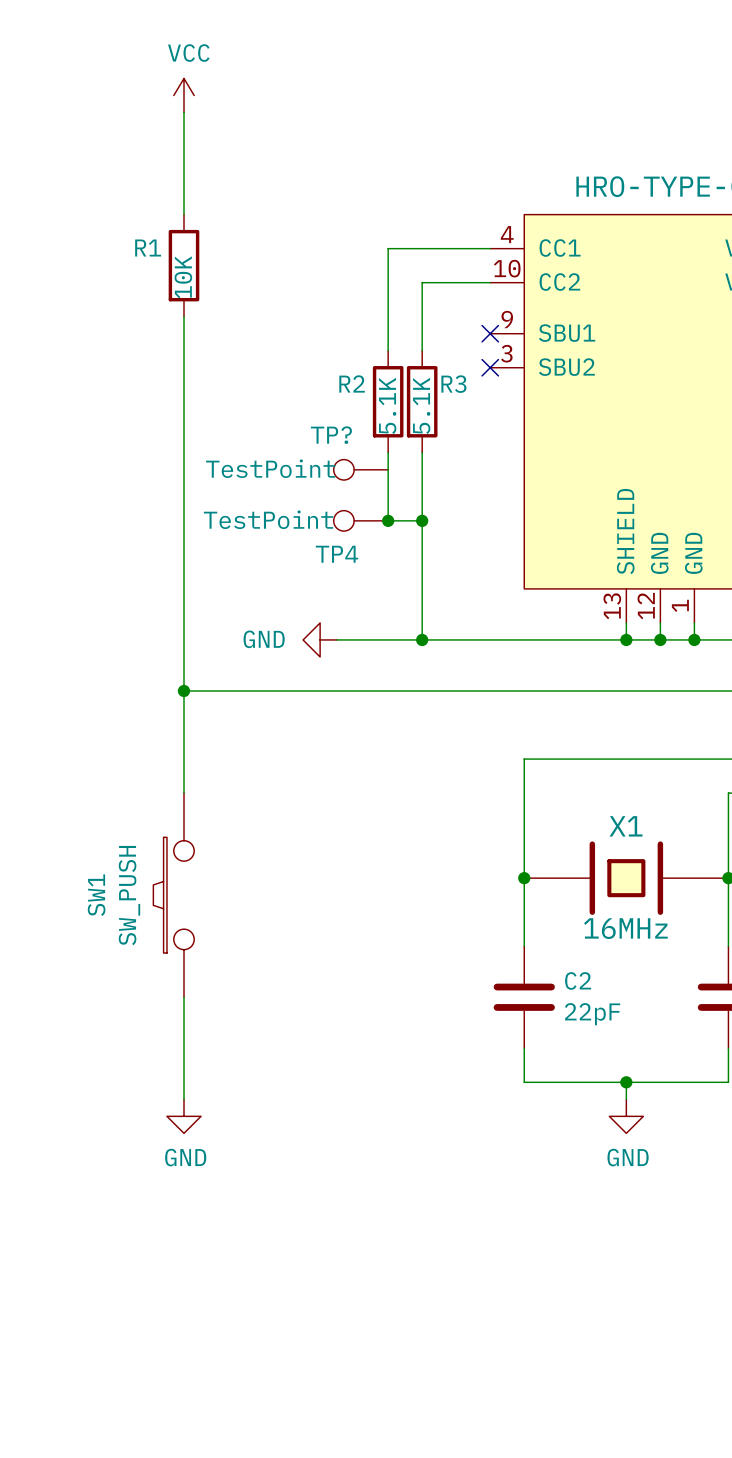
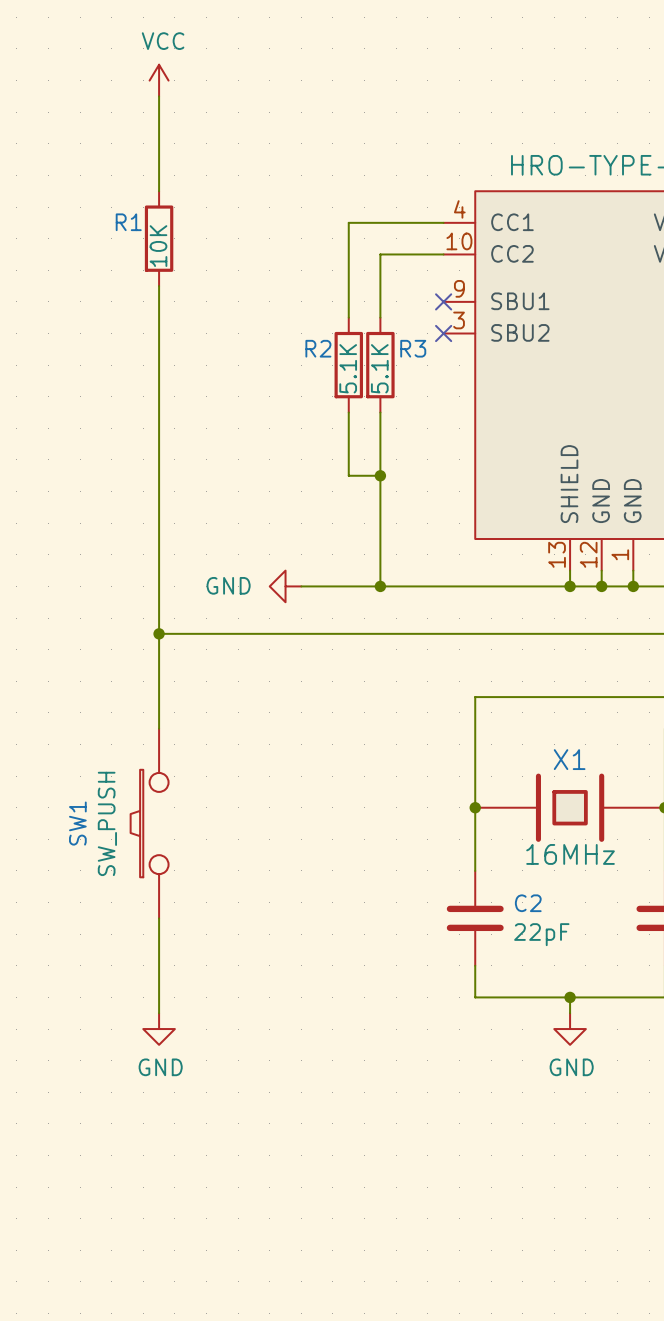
TP?: TestPoint (360, 469) -> none
TP4: TestPoint (360, 520) -> none
junction: (388, 520) -> none

